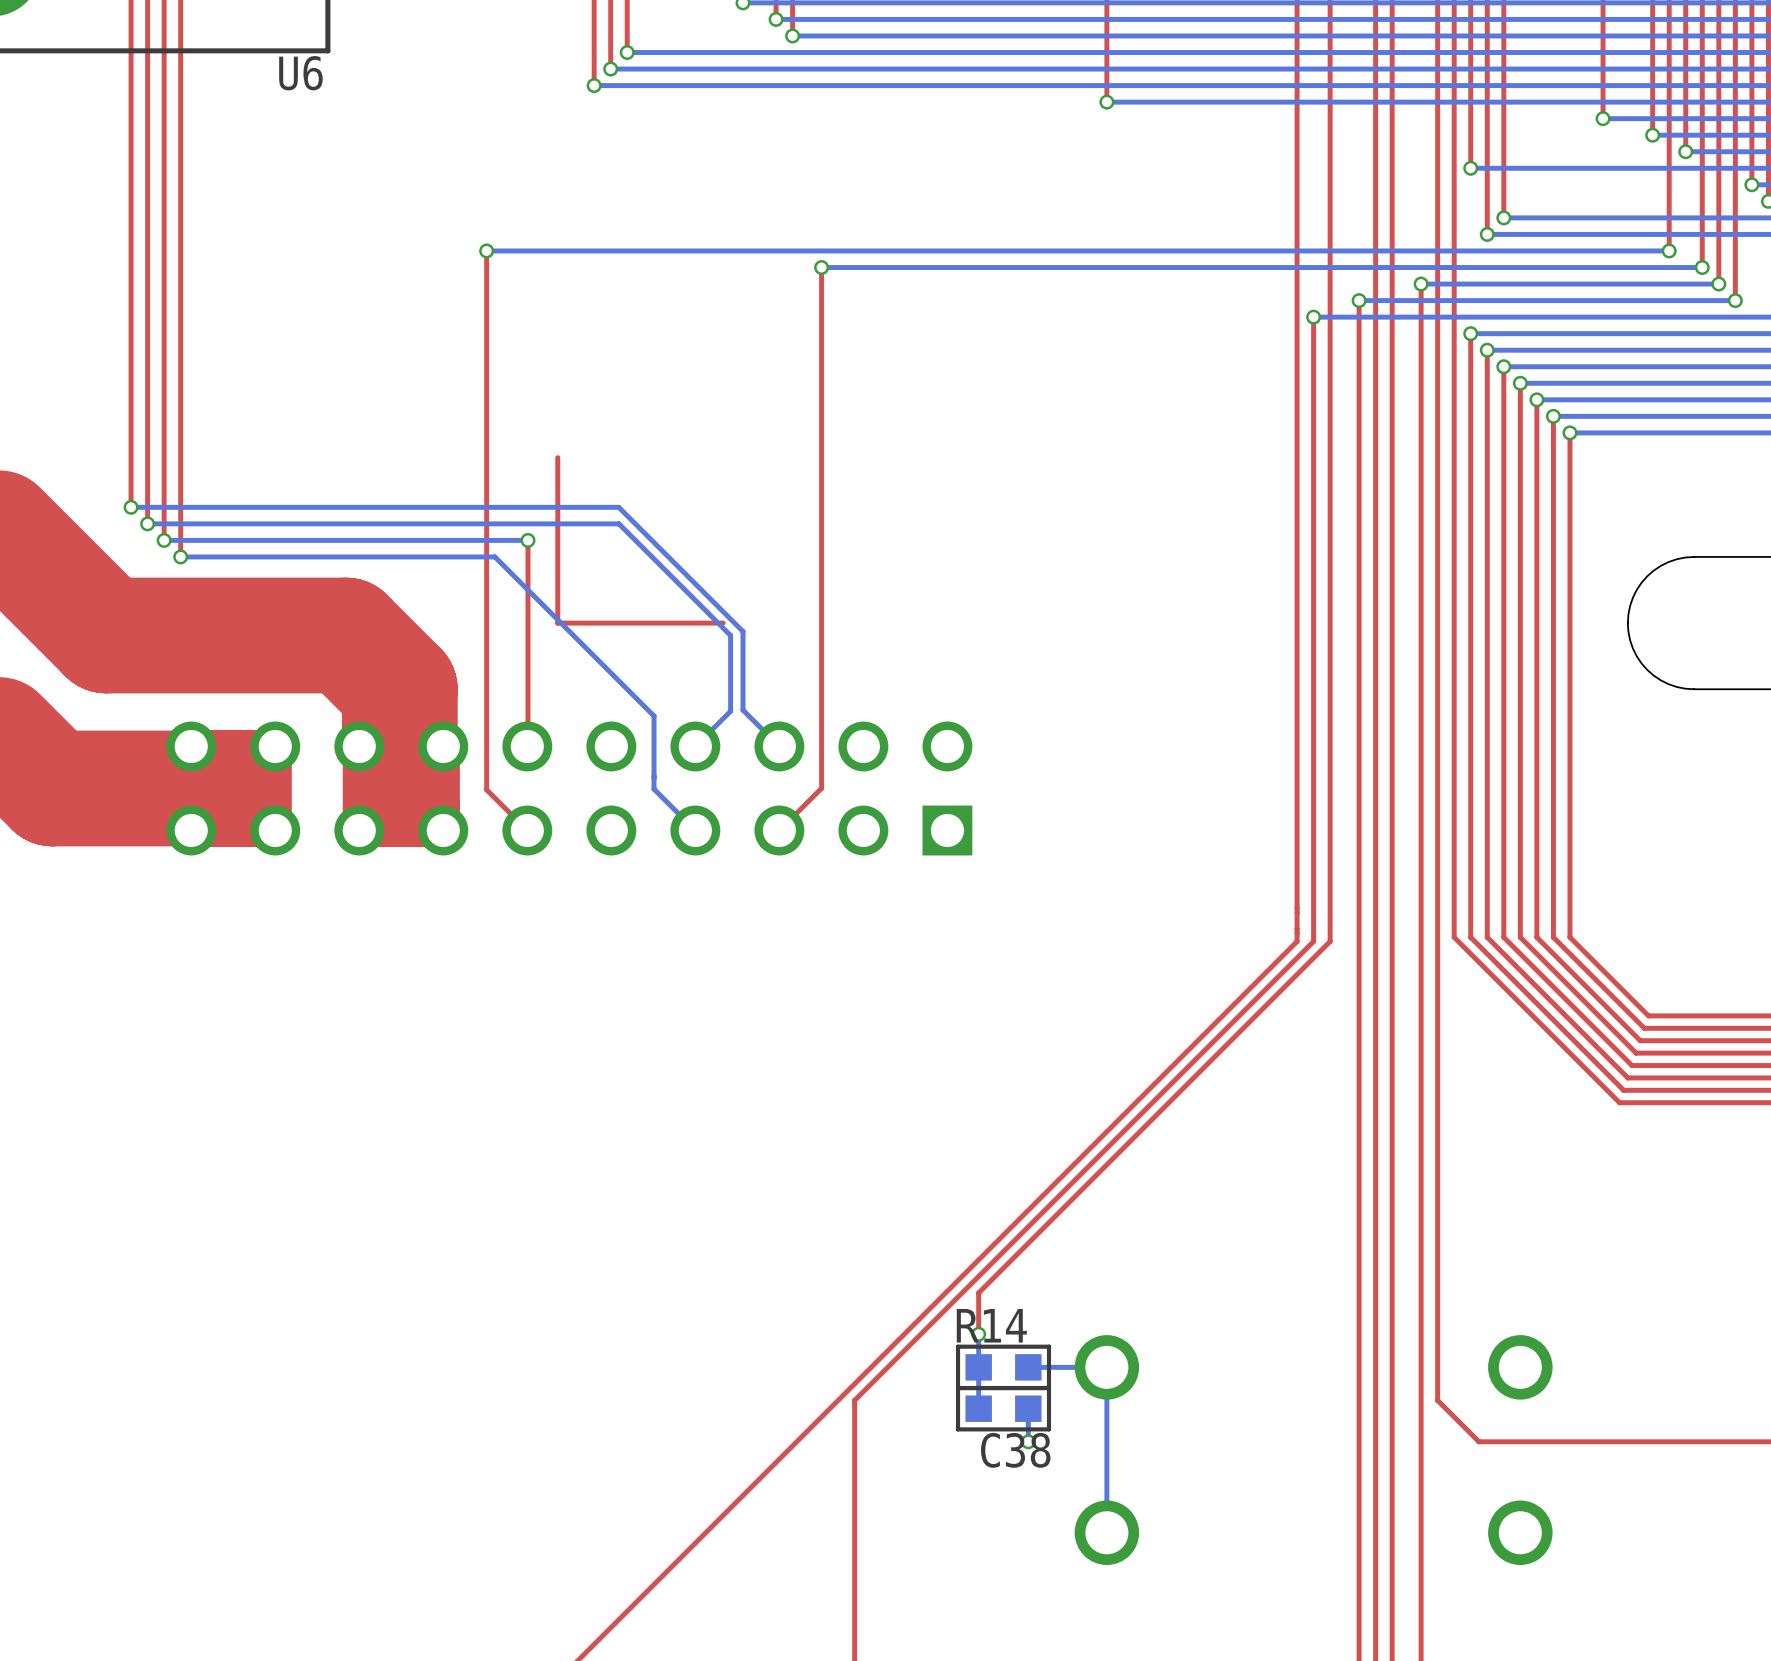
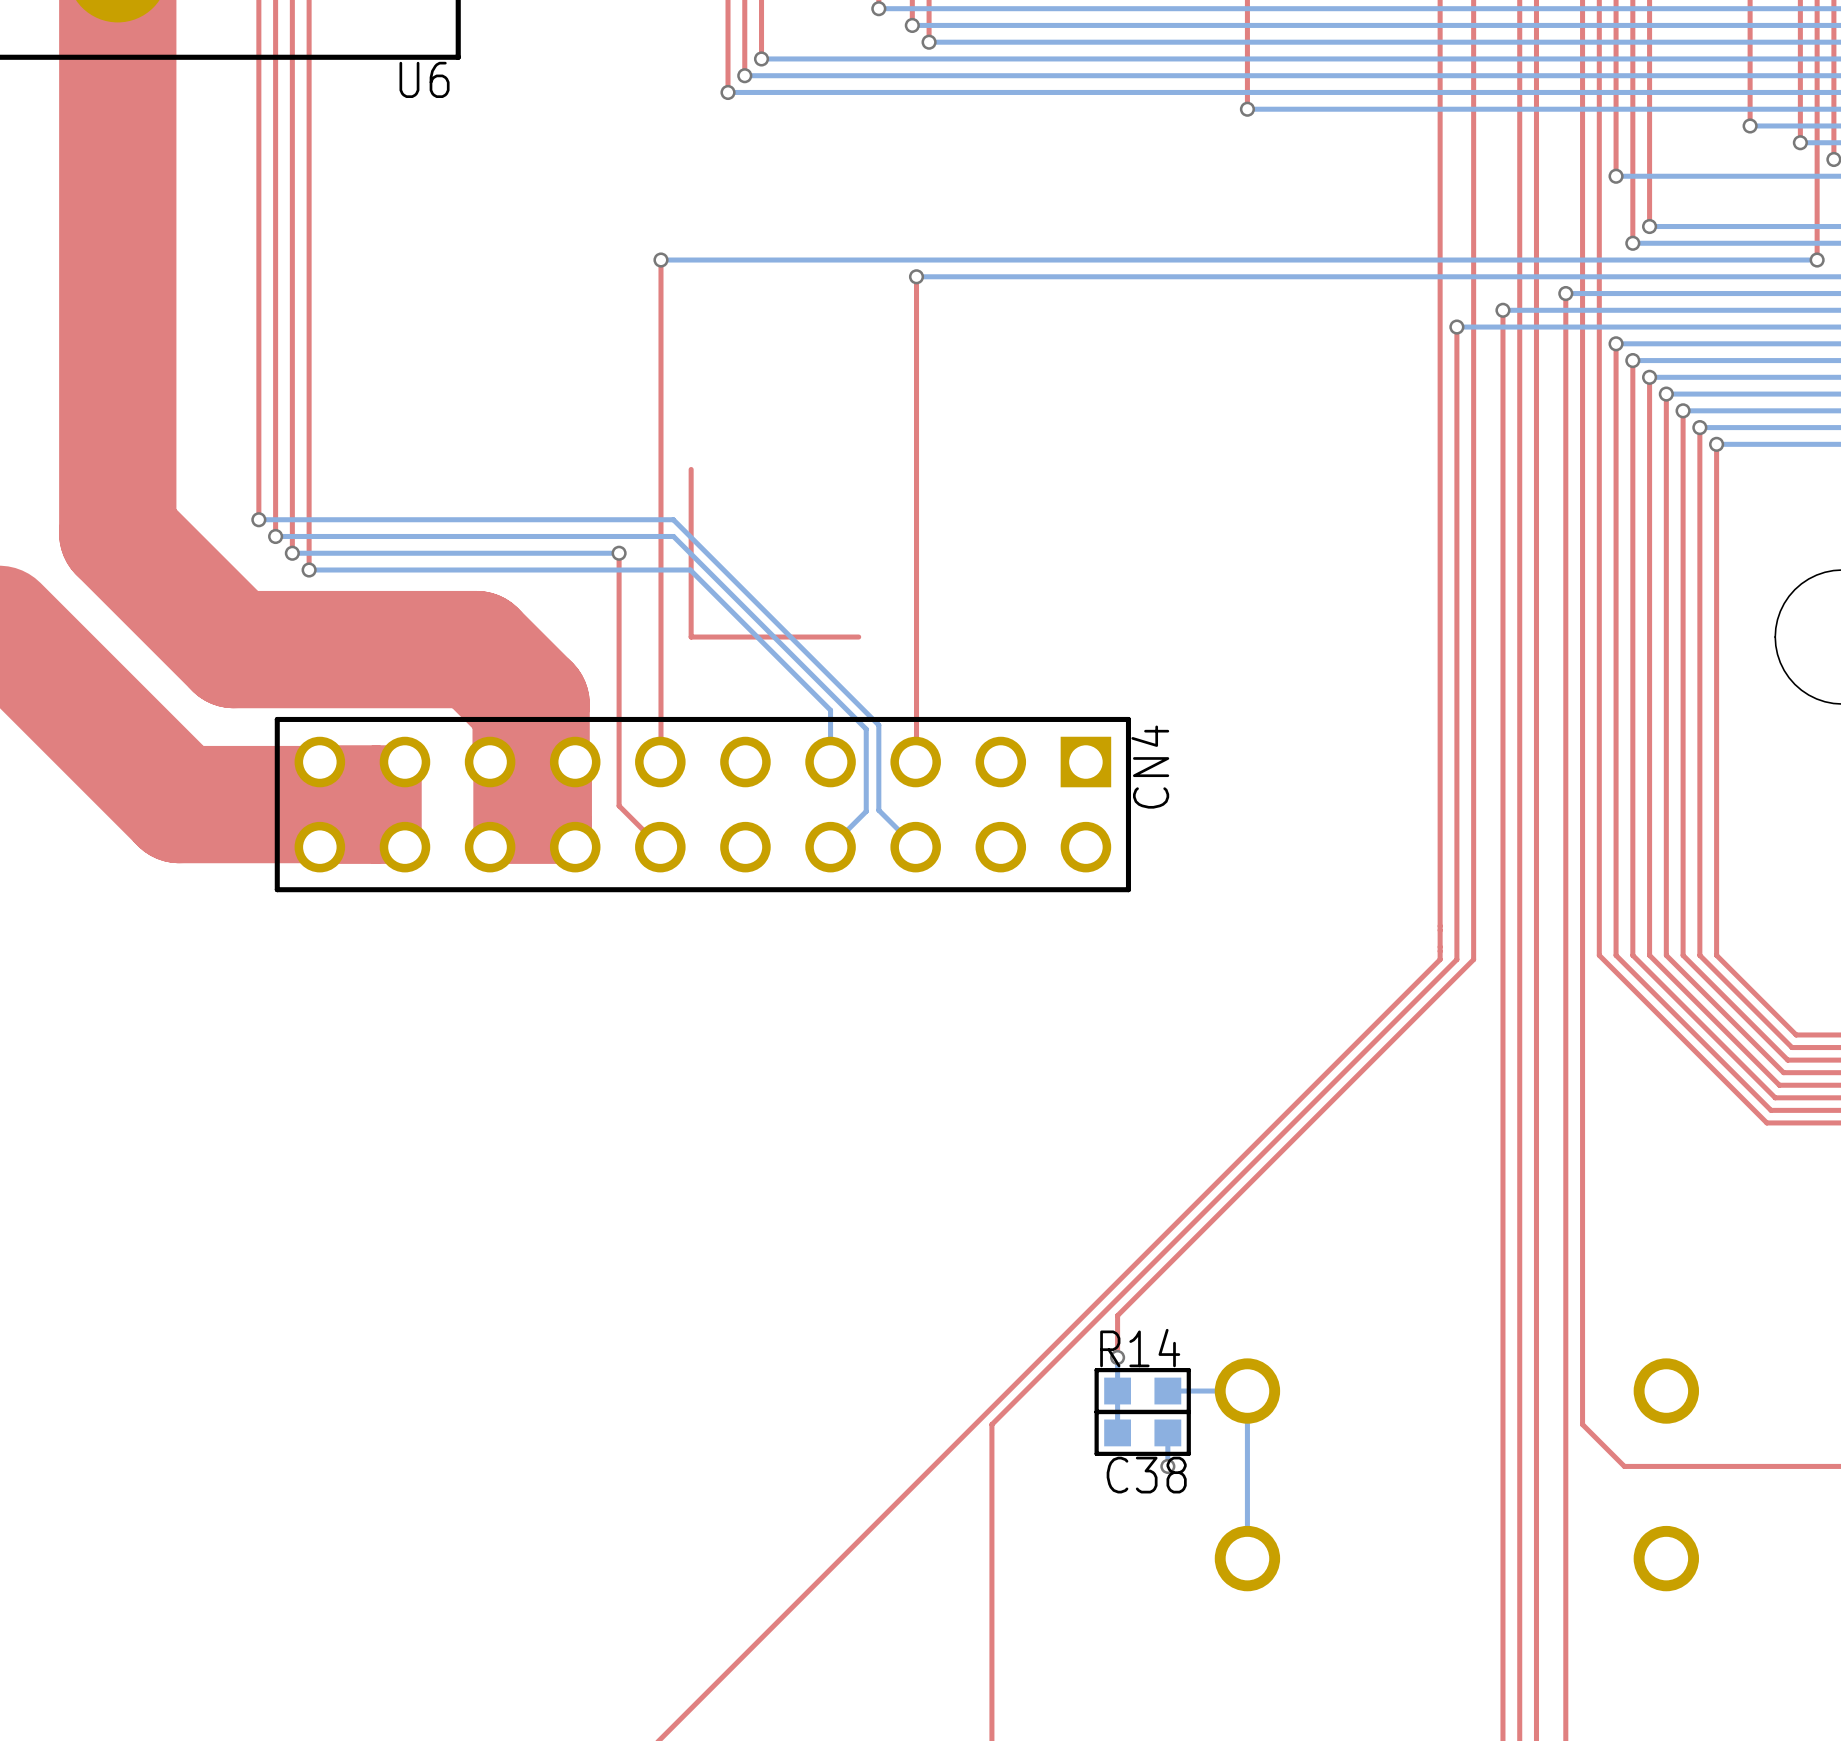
top track: (486, 250) (486, 540) -> (660, 260) (660, 553)
via position: (486, 250) -> (660, 260)
bottom track: (528, 250) (486, 250) -> (958, 276) (916, 276)
top track: none -> (916, 276) (915, 762)
top track: (821, 267) (821, 788) (779, 830) -> none
via position: (821, 267) -> (916, 276)
bottom track: (540, 507) (618, 507) (743, 631) (743, 710) (779, 746) -> (673, 519) (878, 725) (878, 810) (915, 847)
bottom track: (540, 523) (618, 523) (730, 635) (730, 711) (695, 746) -> (627, 570) (690, 570) (830, 710) (830, 762)
bottom track: (528, 540) (486, 540) -> none
via position: (528, 540) -> (619, 553)
bottom track: (494, 556) (654, 716) (654, 789) (695, 830) -> (673, 536) (866, 729) (866, 811) (830, 847)
CN4 side: top (569, 788) -> bottom (702, 804)

